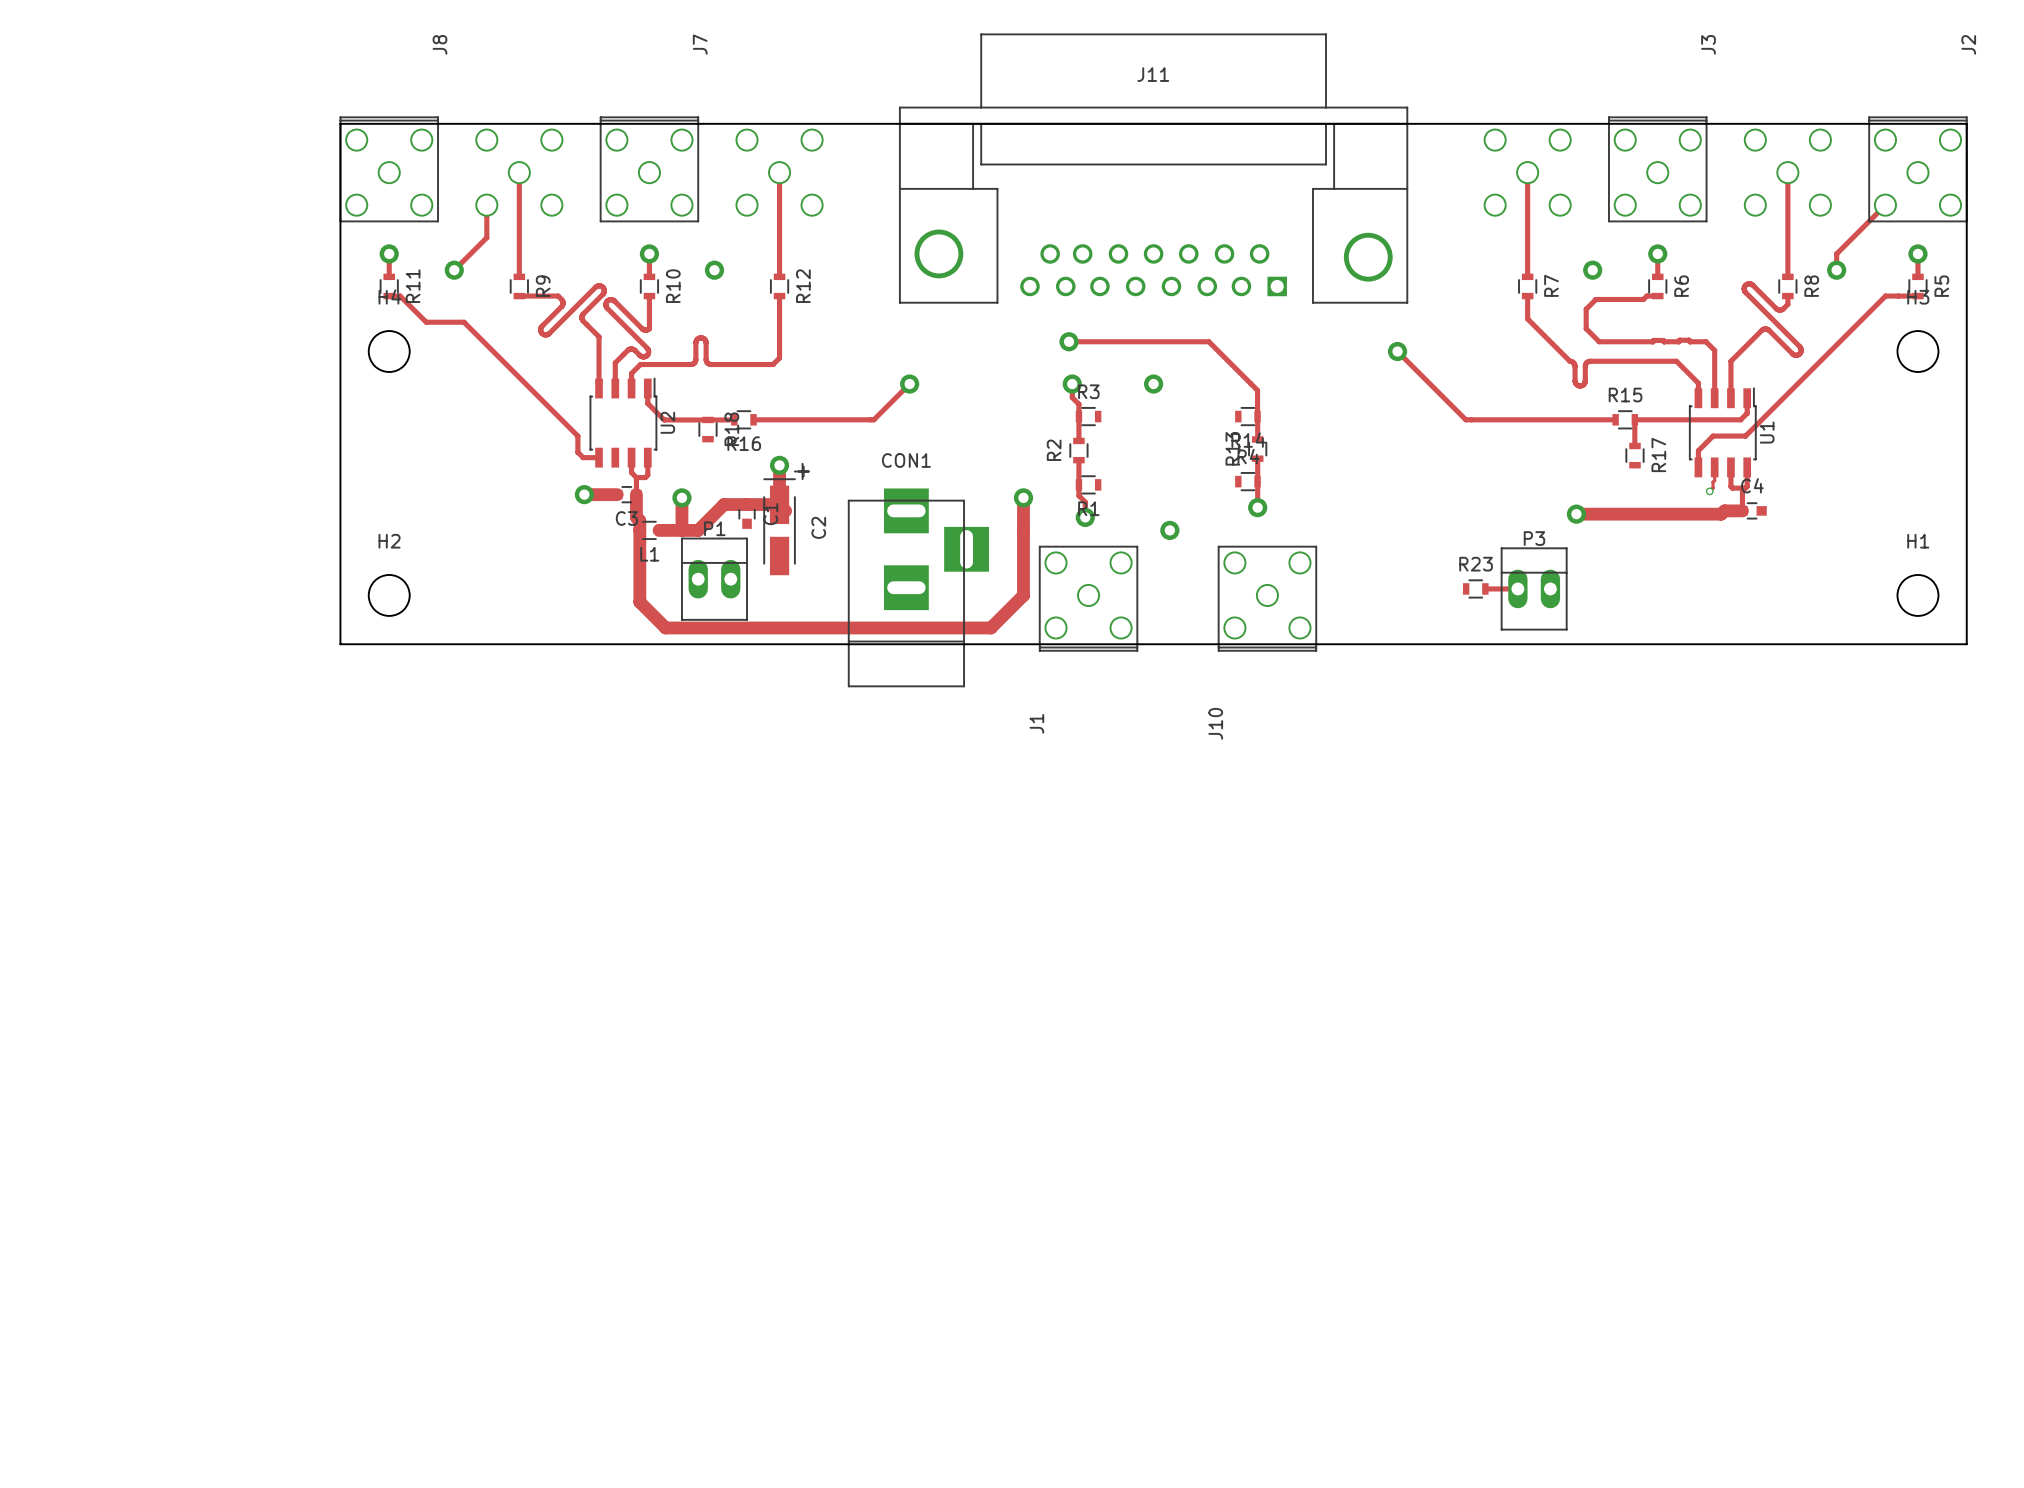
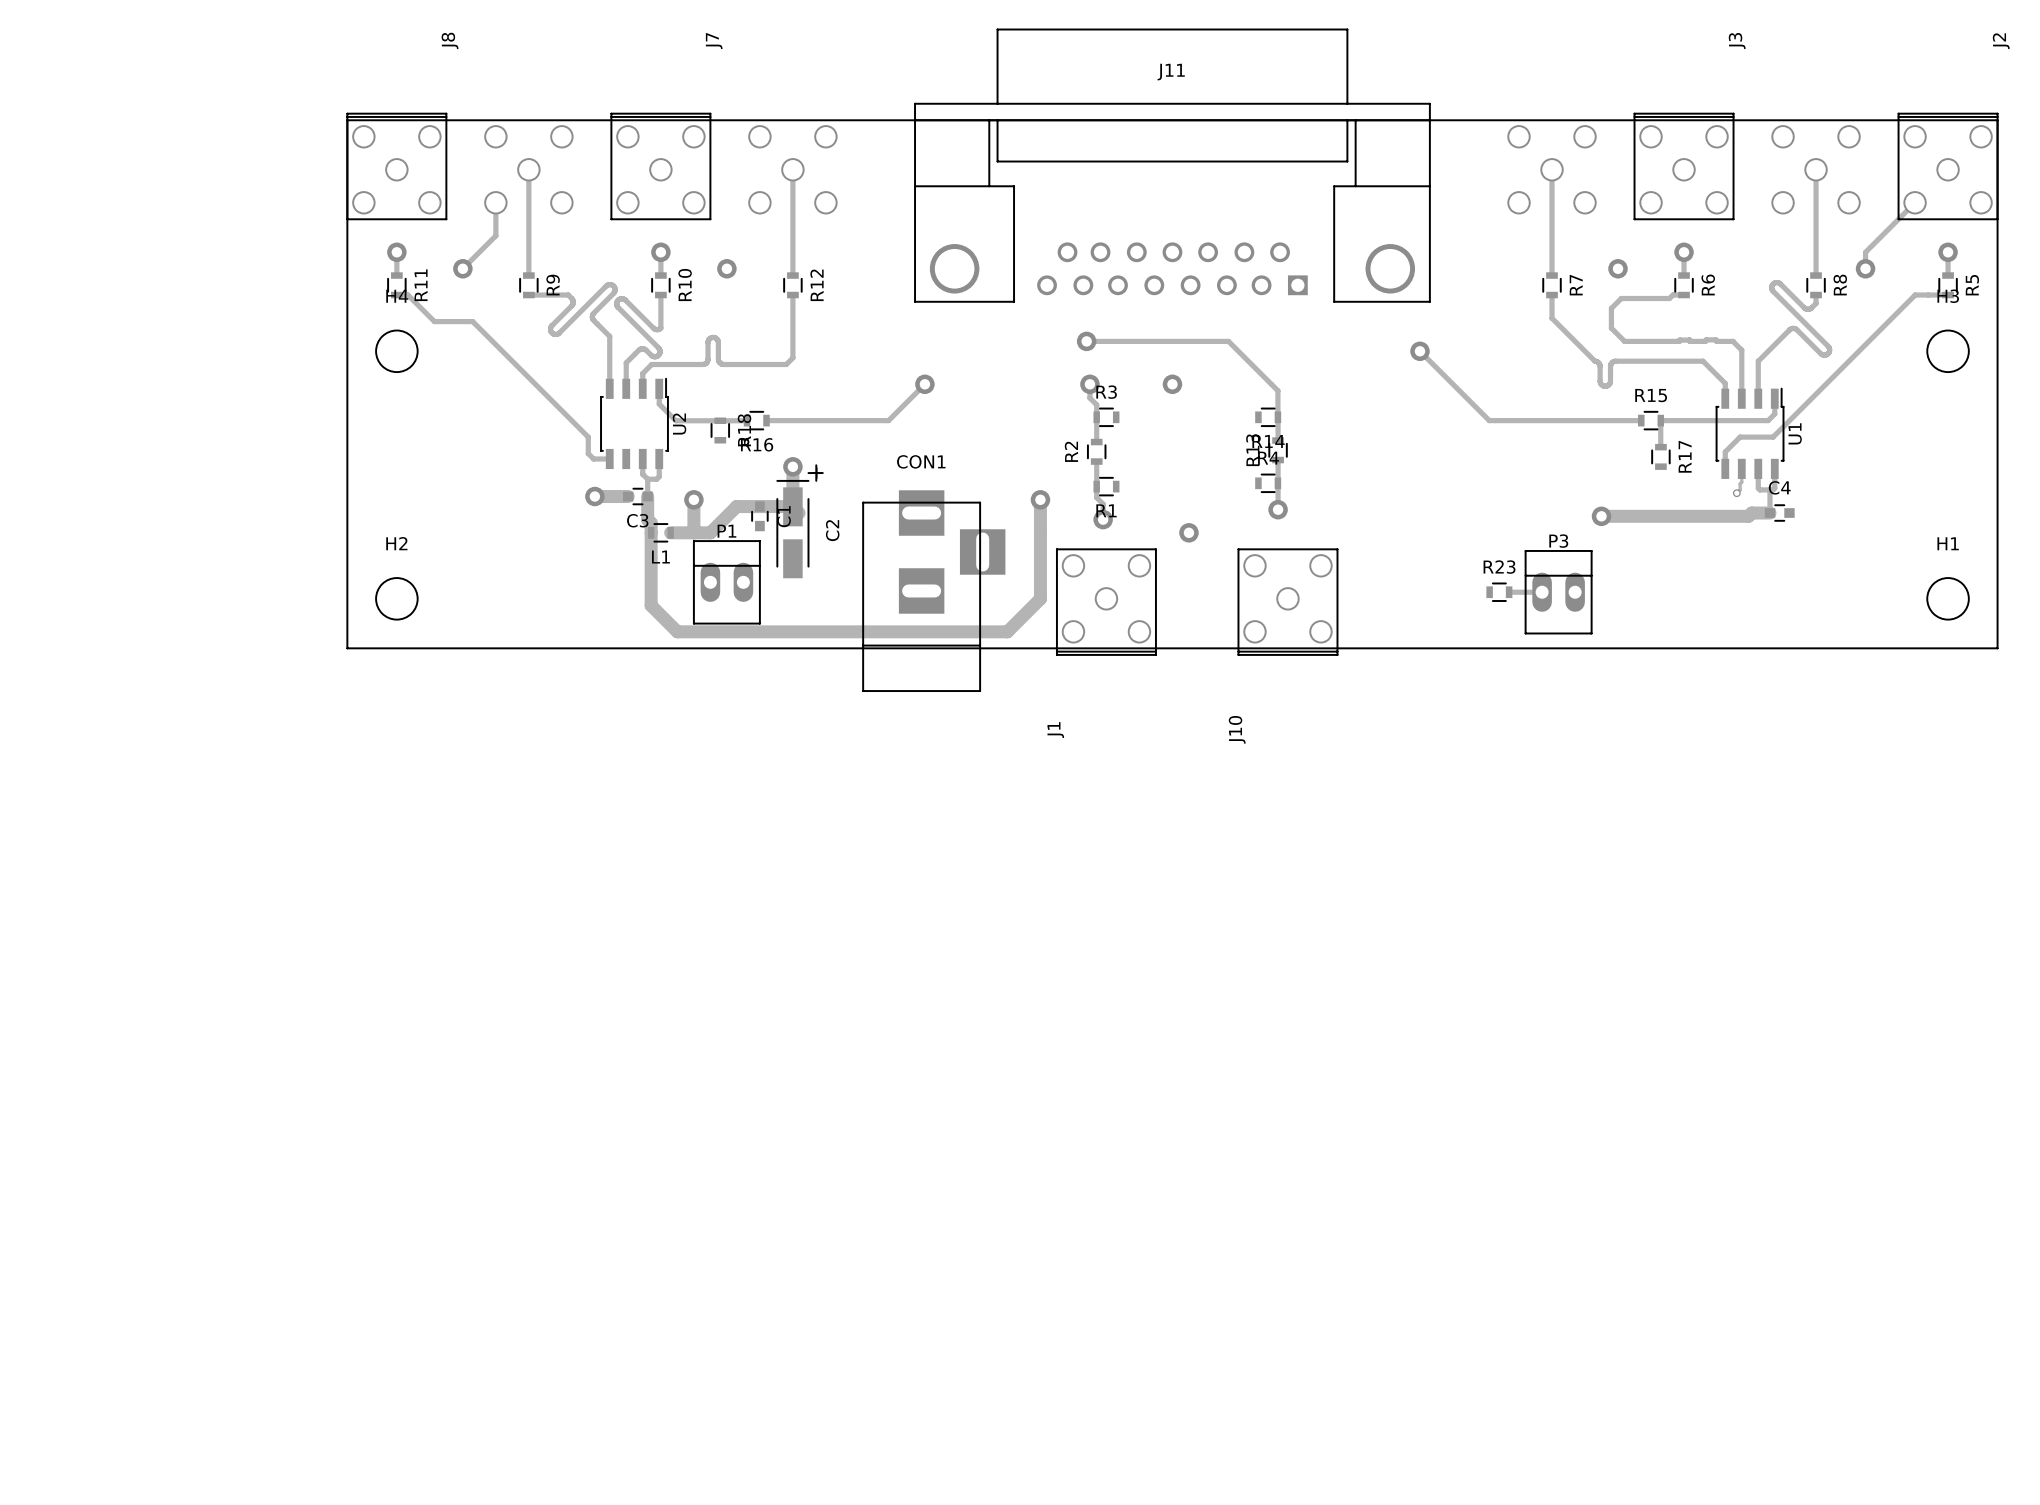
J11 footprint: [898, 33, 1409, 304] -> [914, 28, 1431, 303]

